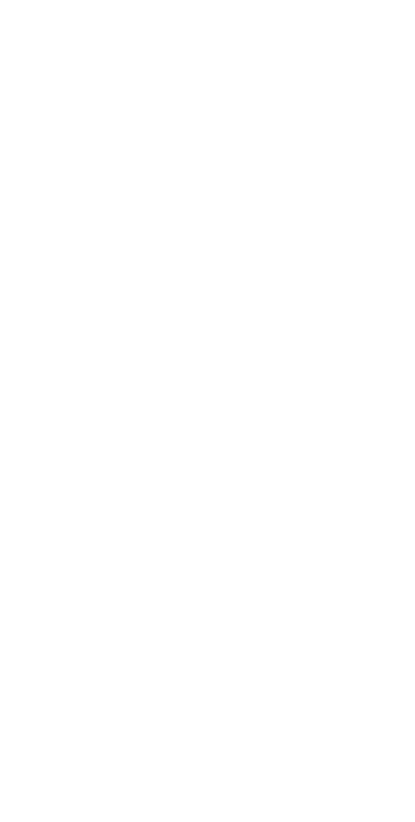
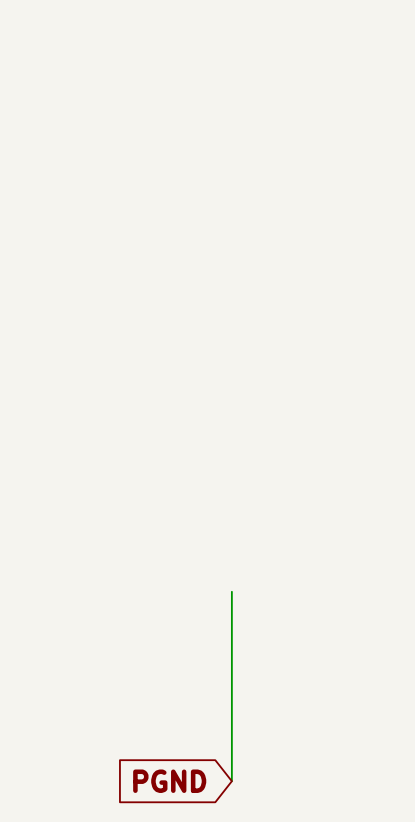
wire: none -> (231, 591) (231, 781)
global label: none -> PGND (169, 781)

